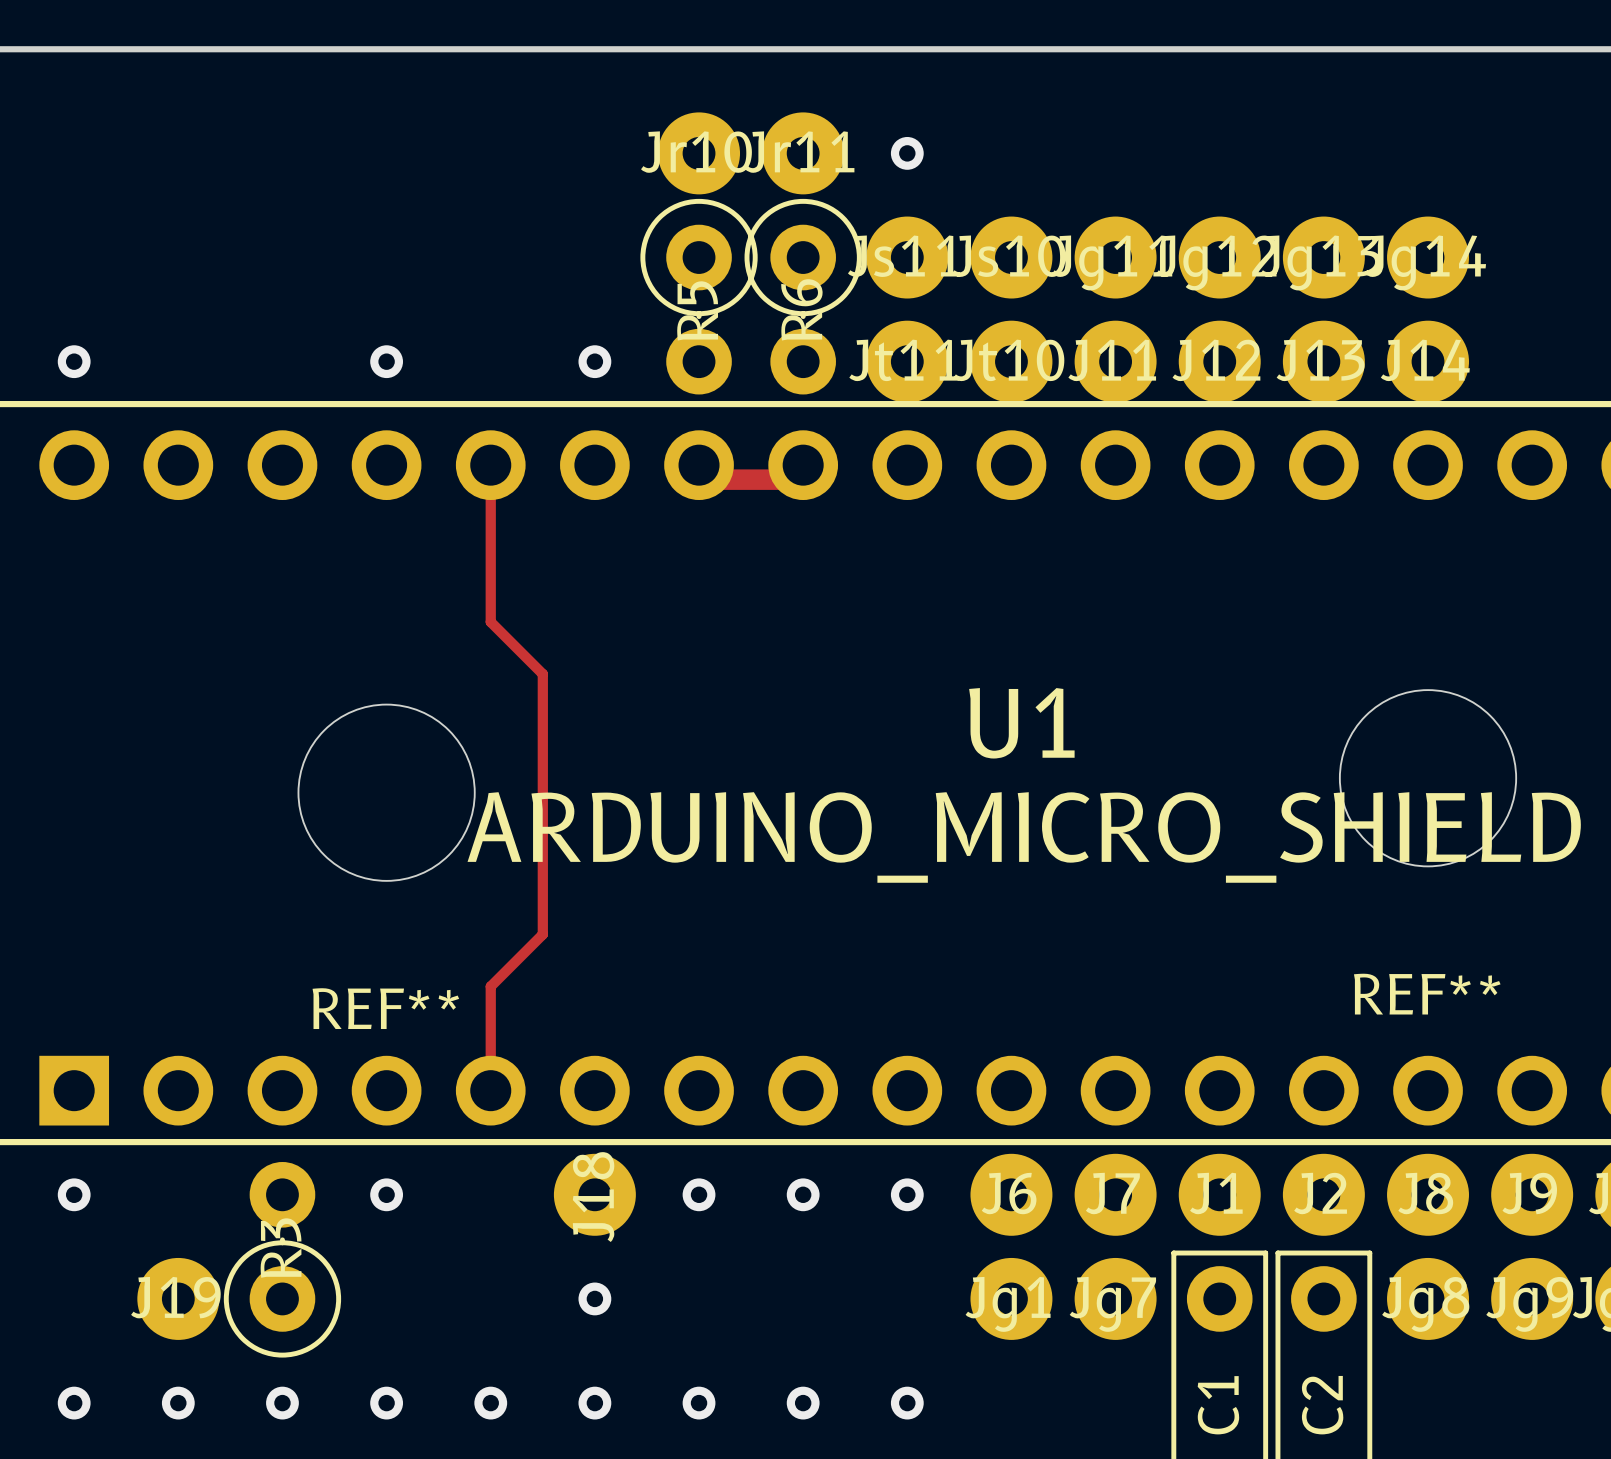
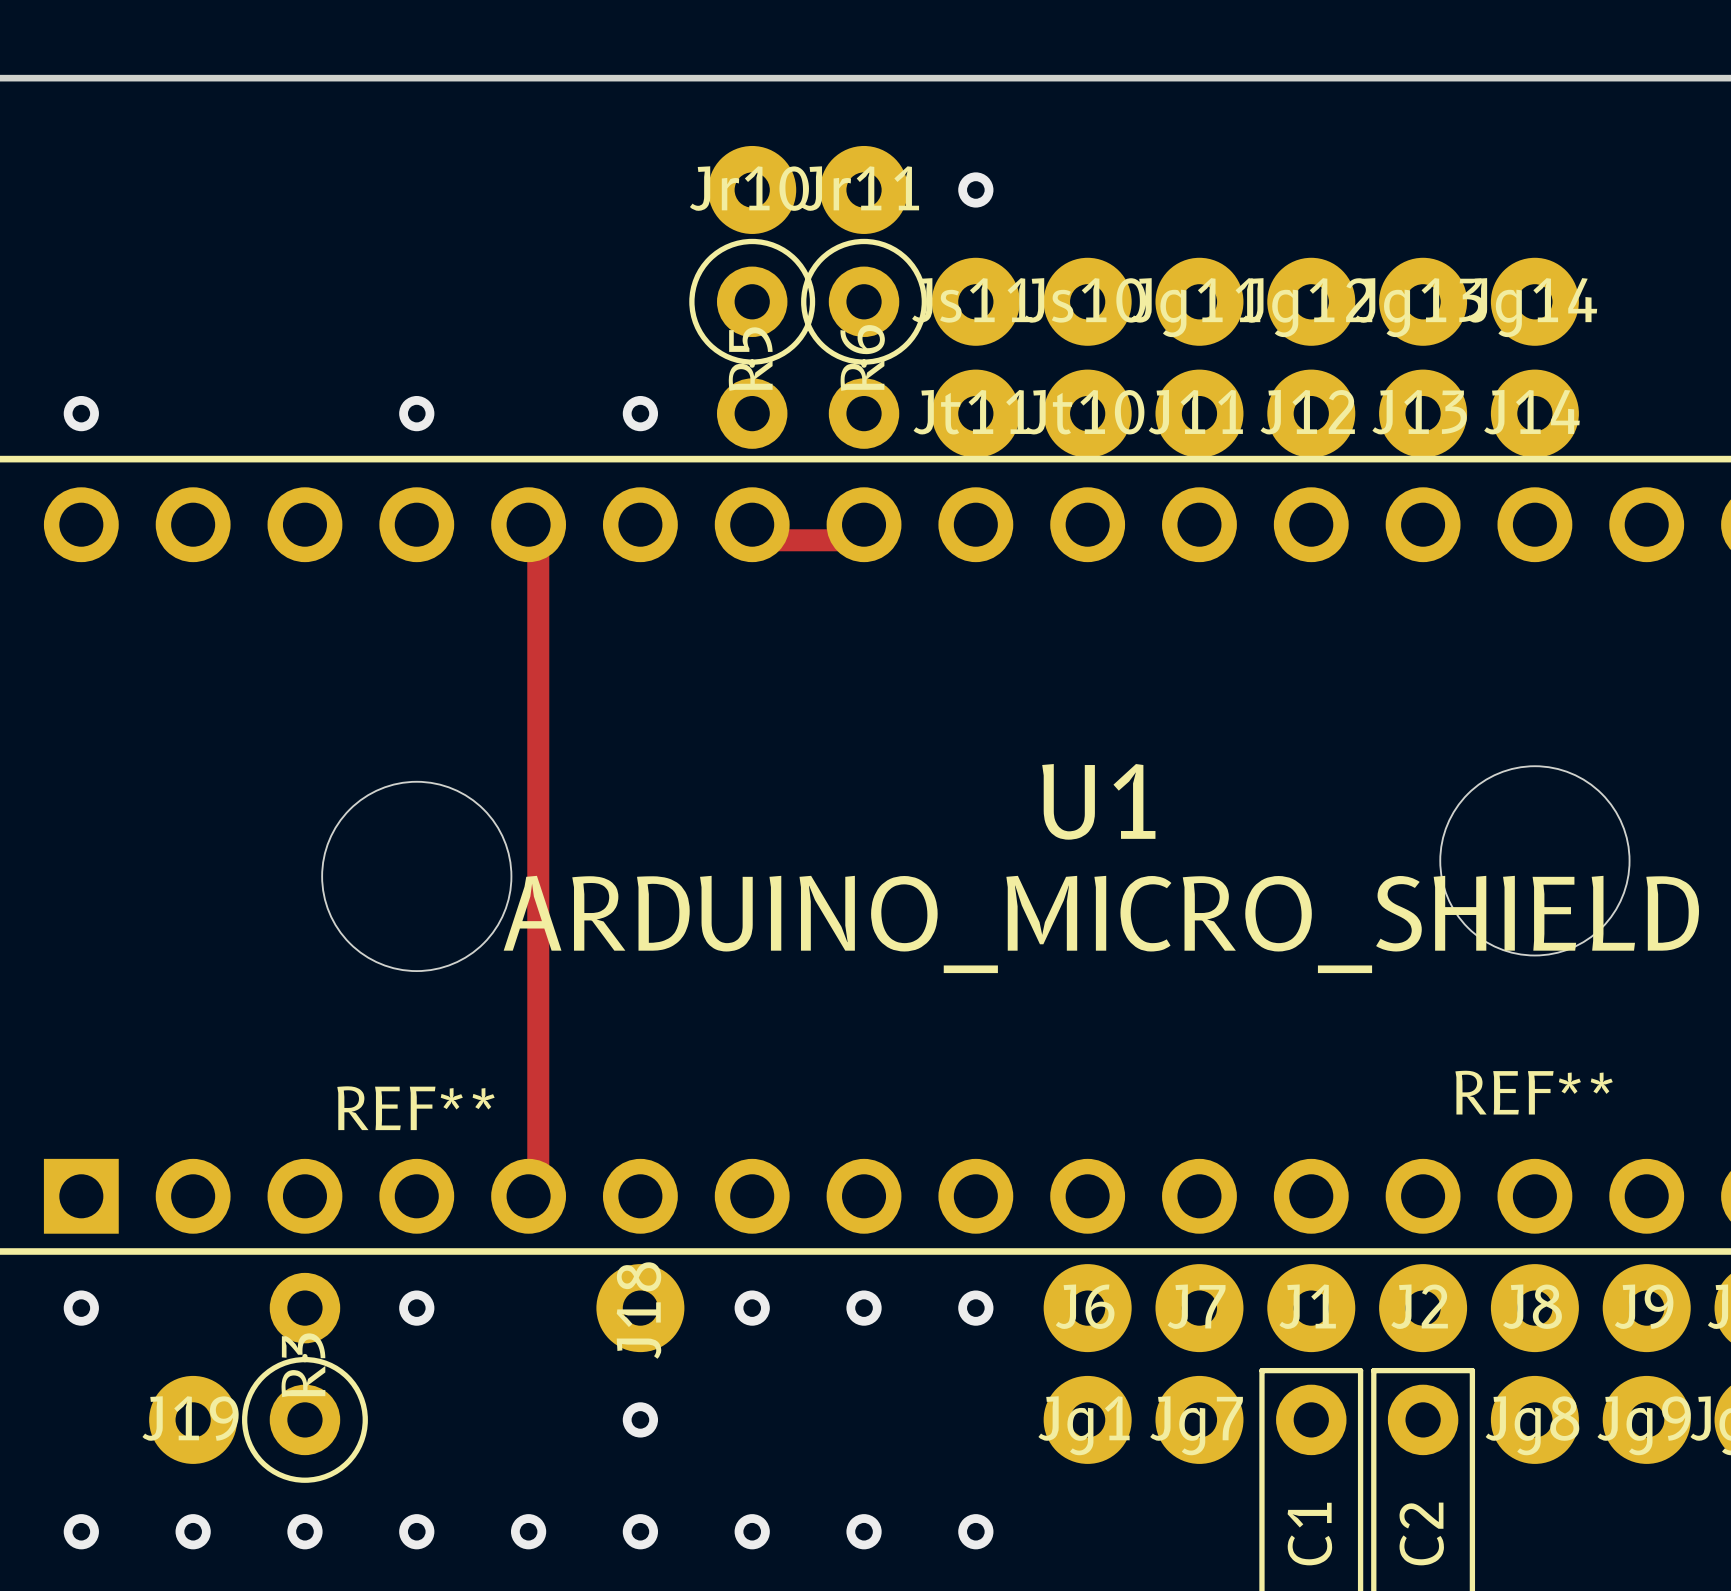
track: (490, 465) (490, 622) (542, 674) (542, 934) (490, 986) (490, 1090) -> none
track: none -> (538, 540) (538, 1211)

